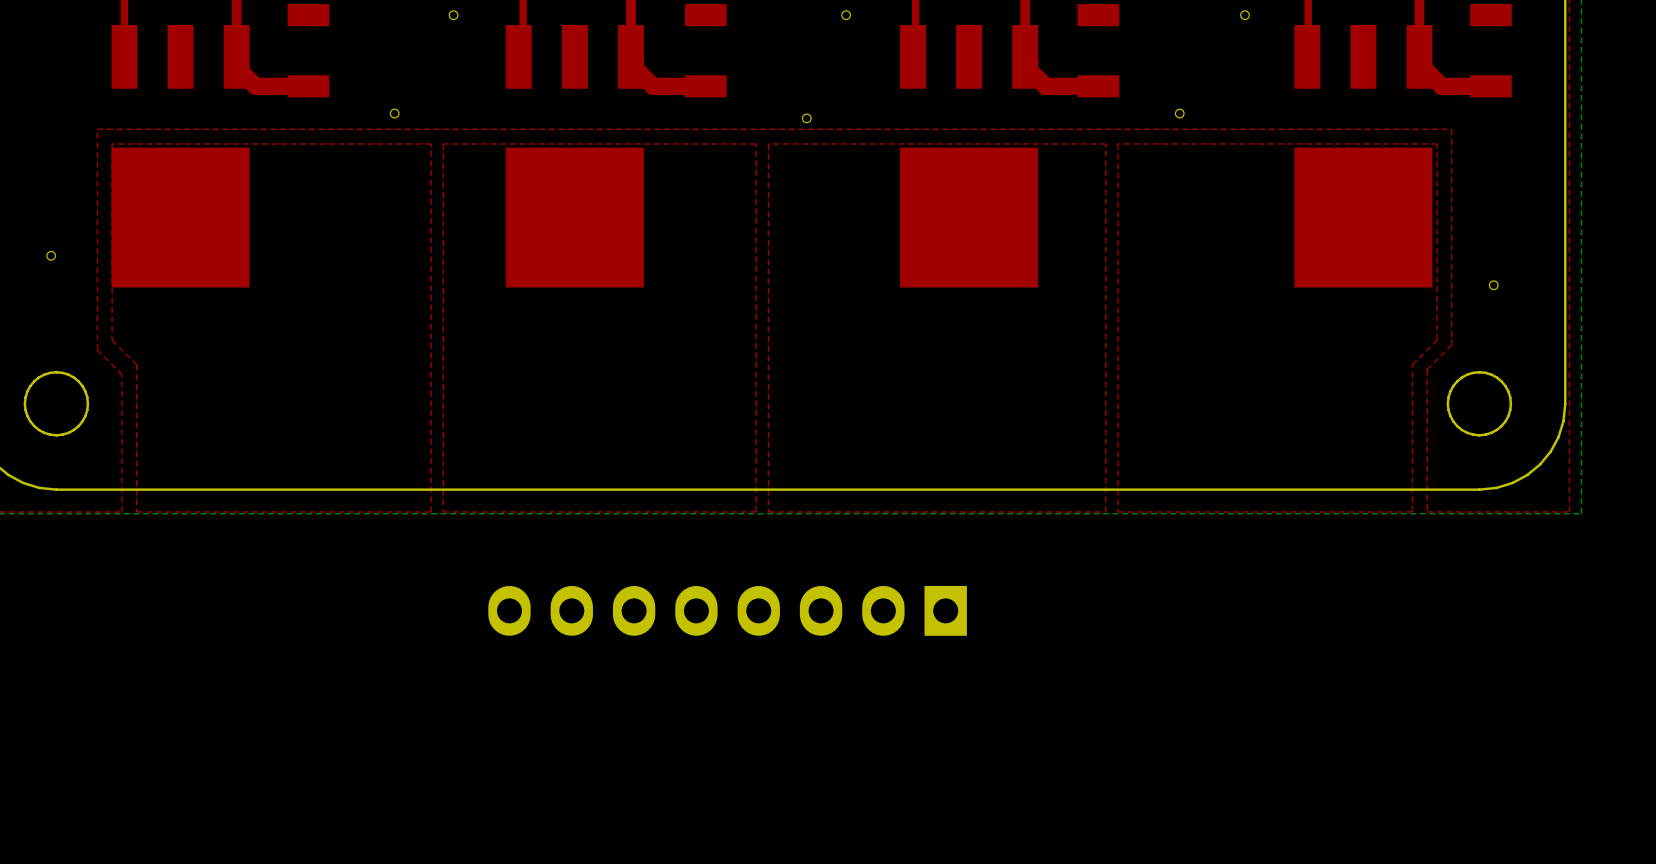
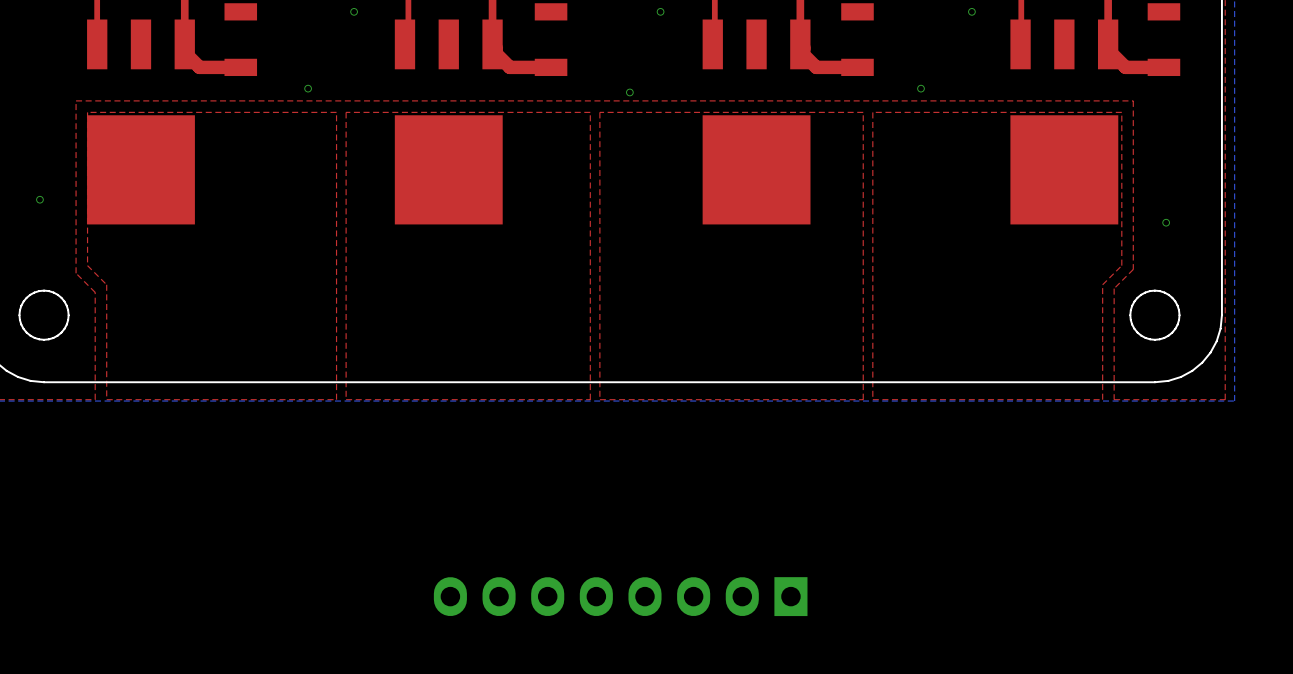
part position: (727, 610) -> (620, 596)

